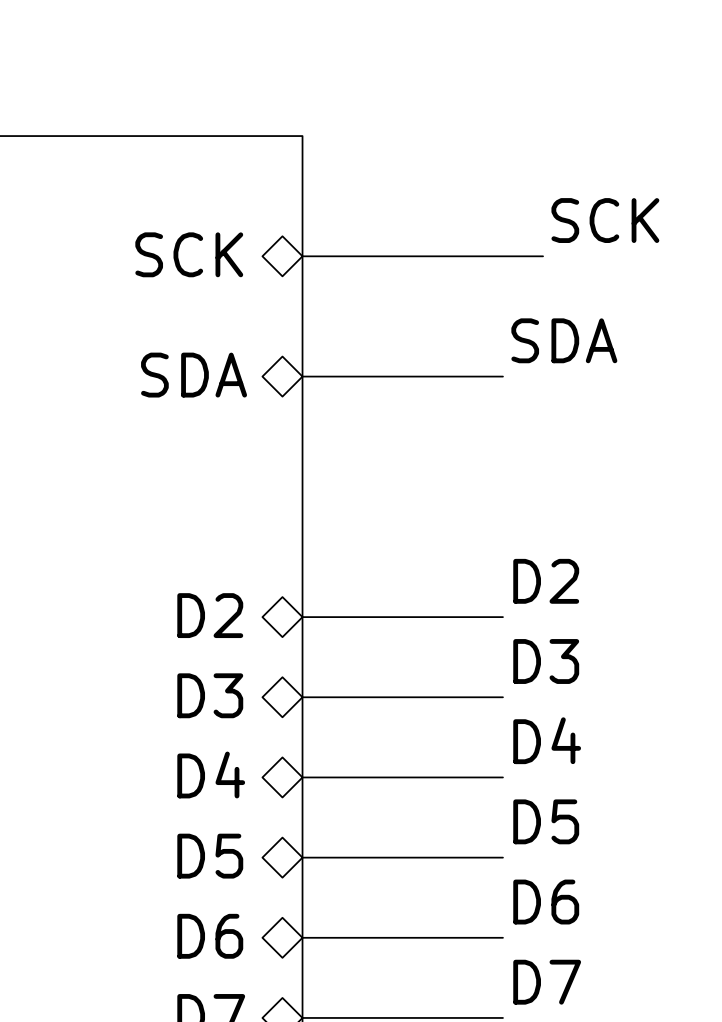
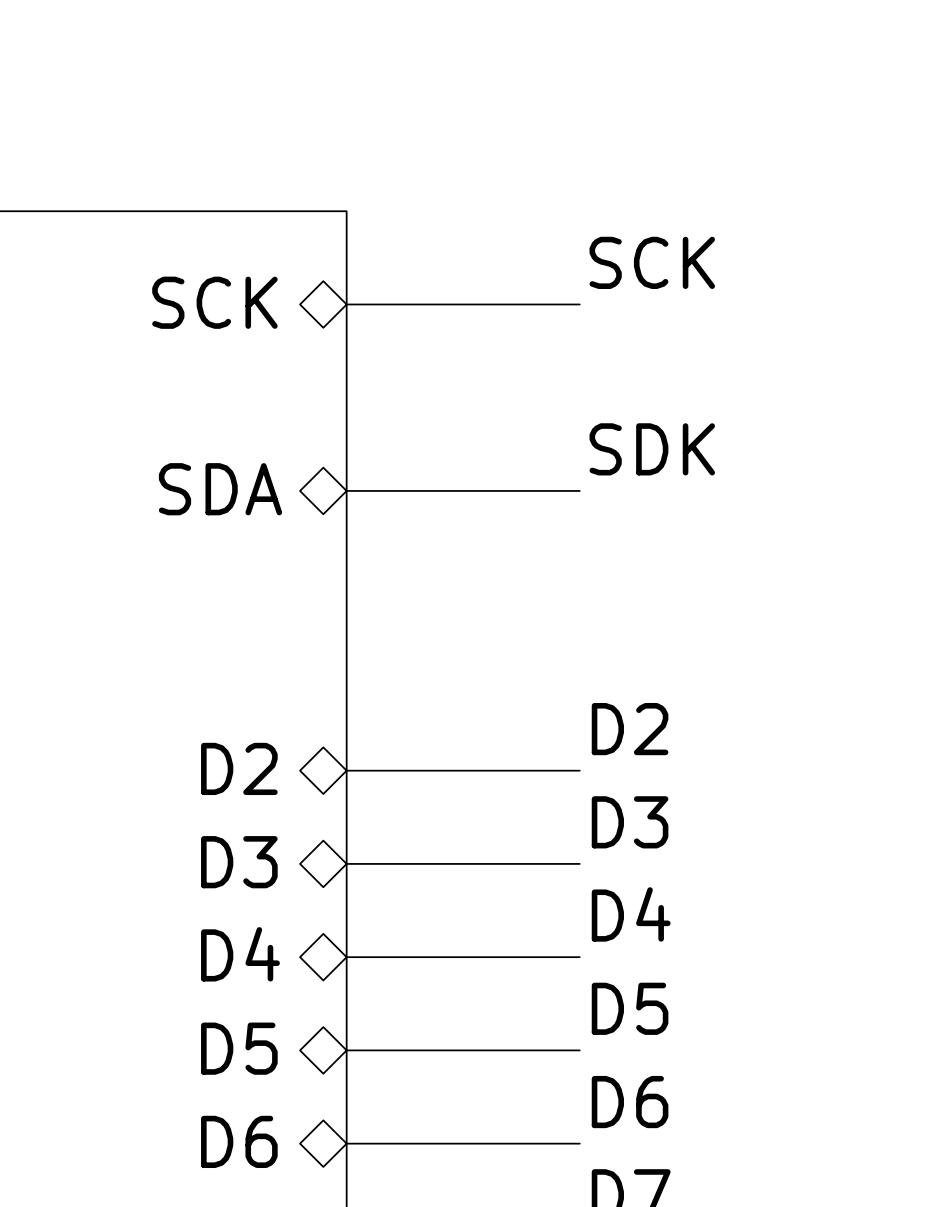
hierarchical label: none -> SCK (214, 302)
wire: none -> (346, 304) (579, 304)
label position: SCK (605, 220) -> SCK (652, 262)
sheet pin: SCK (189, 254) -> none
wire: (302, 256) (543, 256) -> none
label: SDA (564, 340) -> SDK (652, 449)

